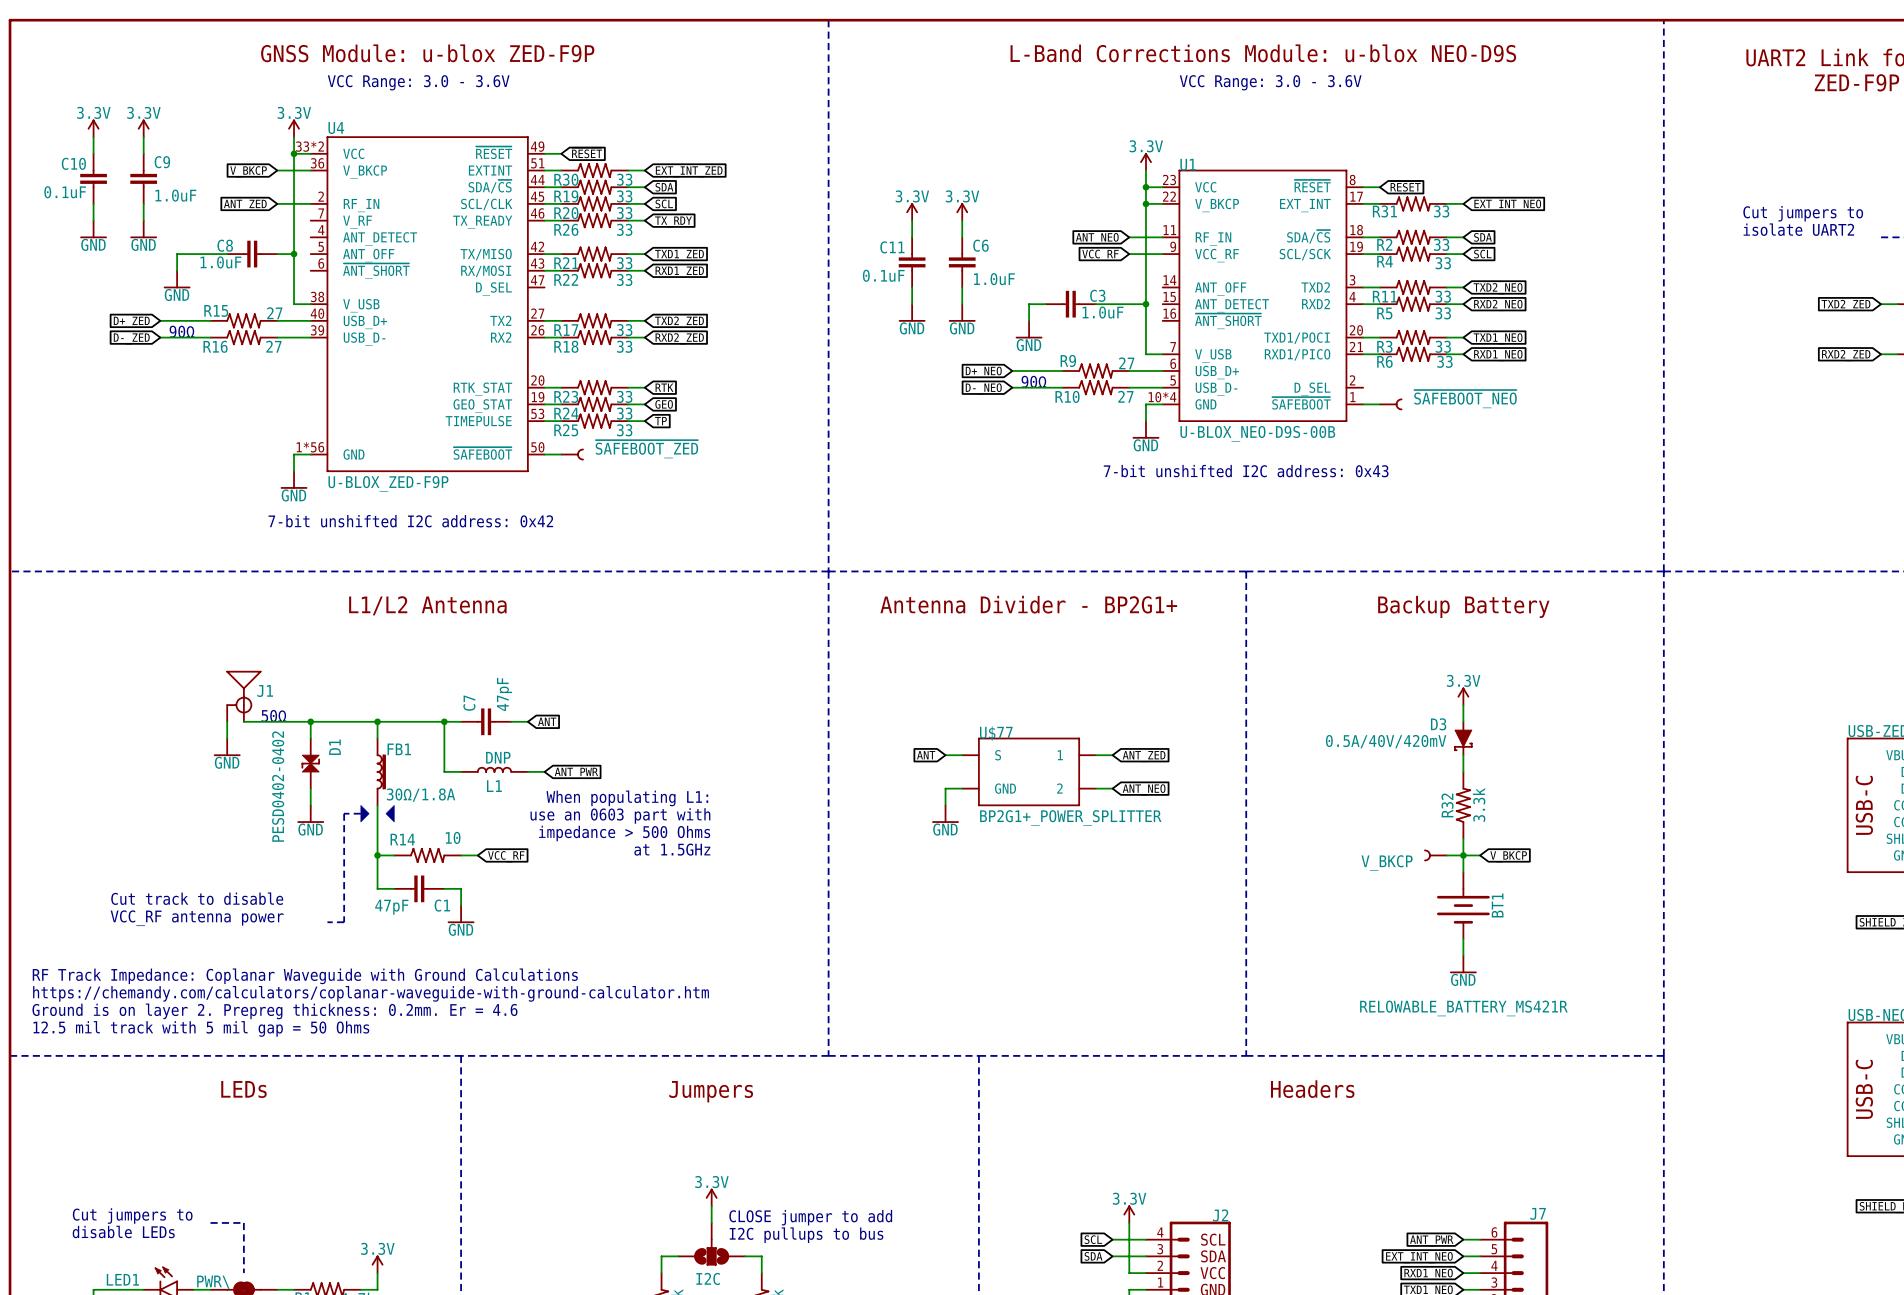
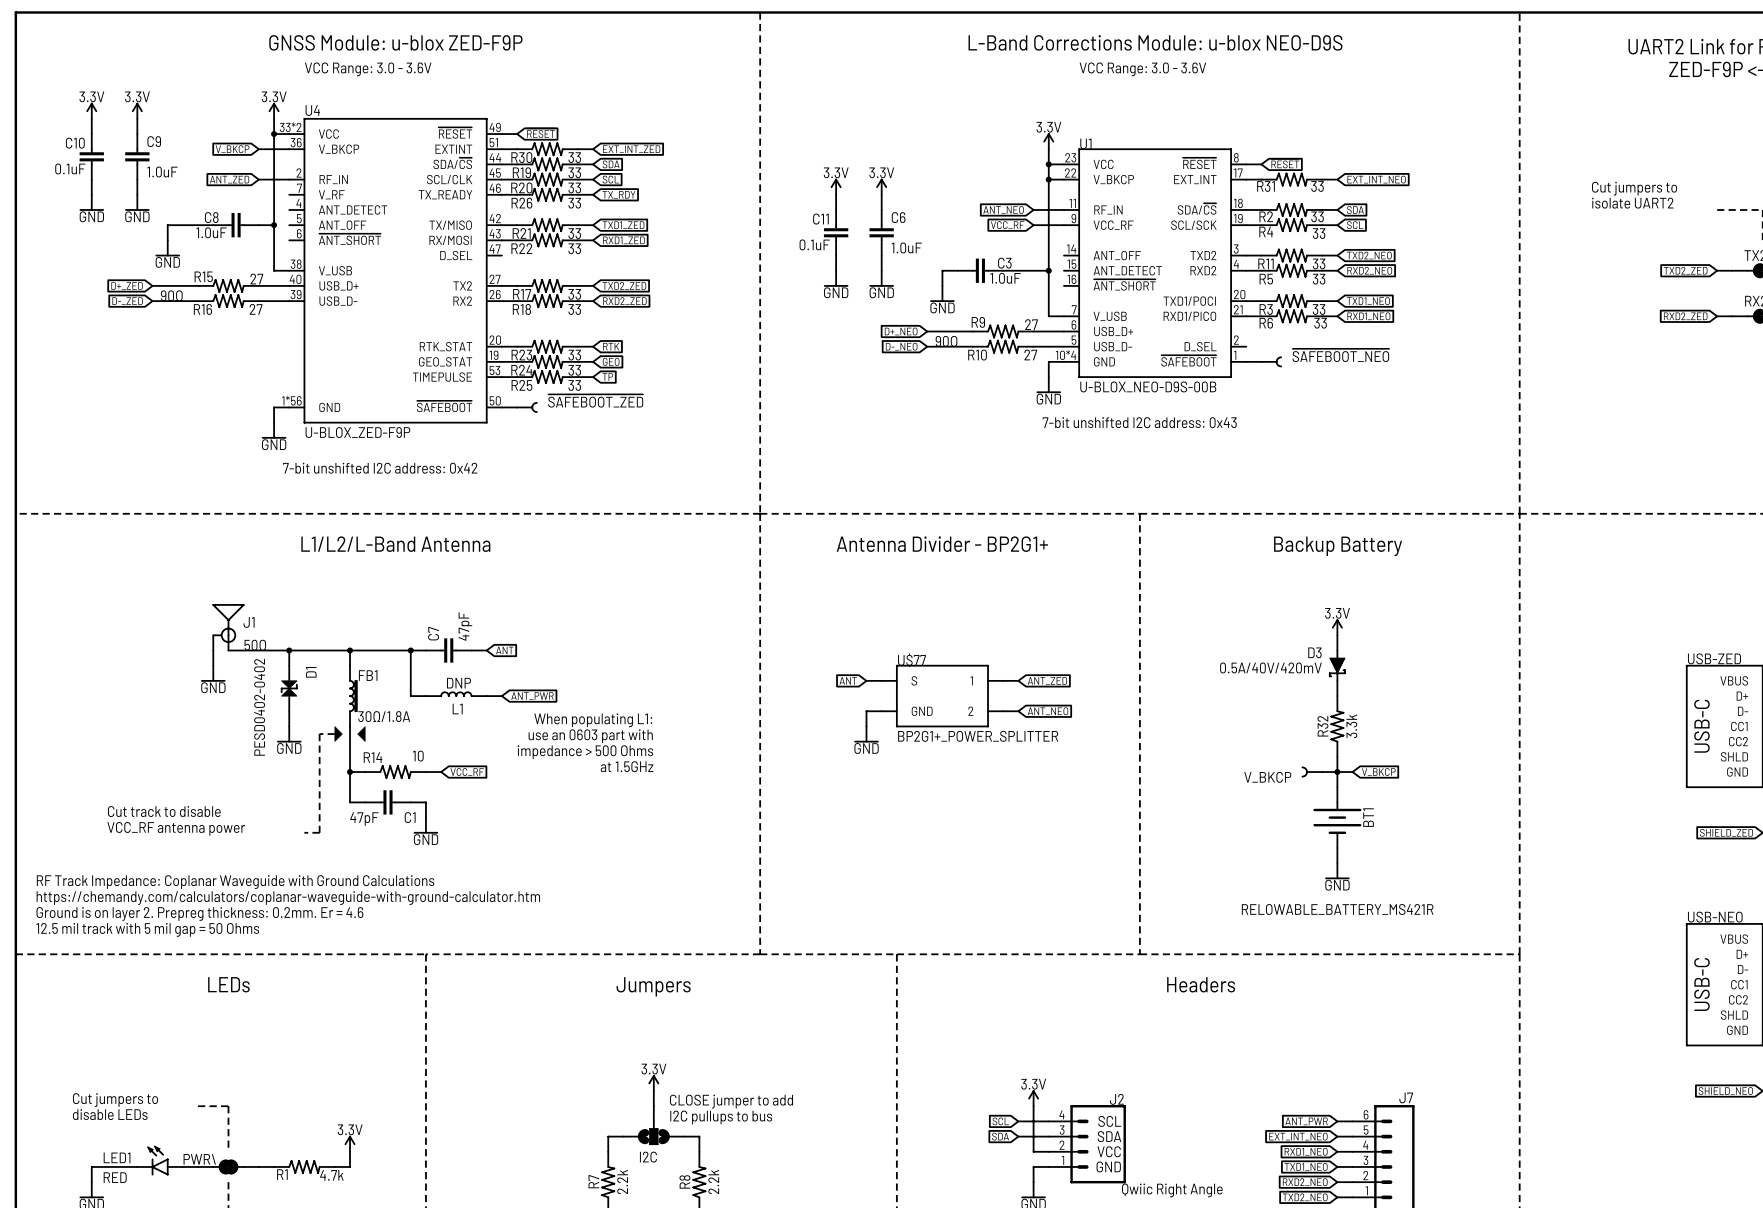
text: L1/L2 Antenna (427, 605) -> L1/L2/L-Band Antenna (395, 544)

